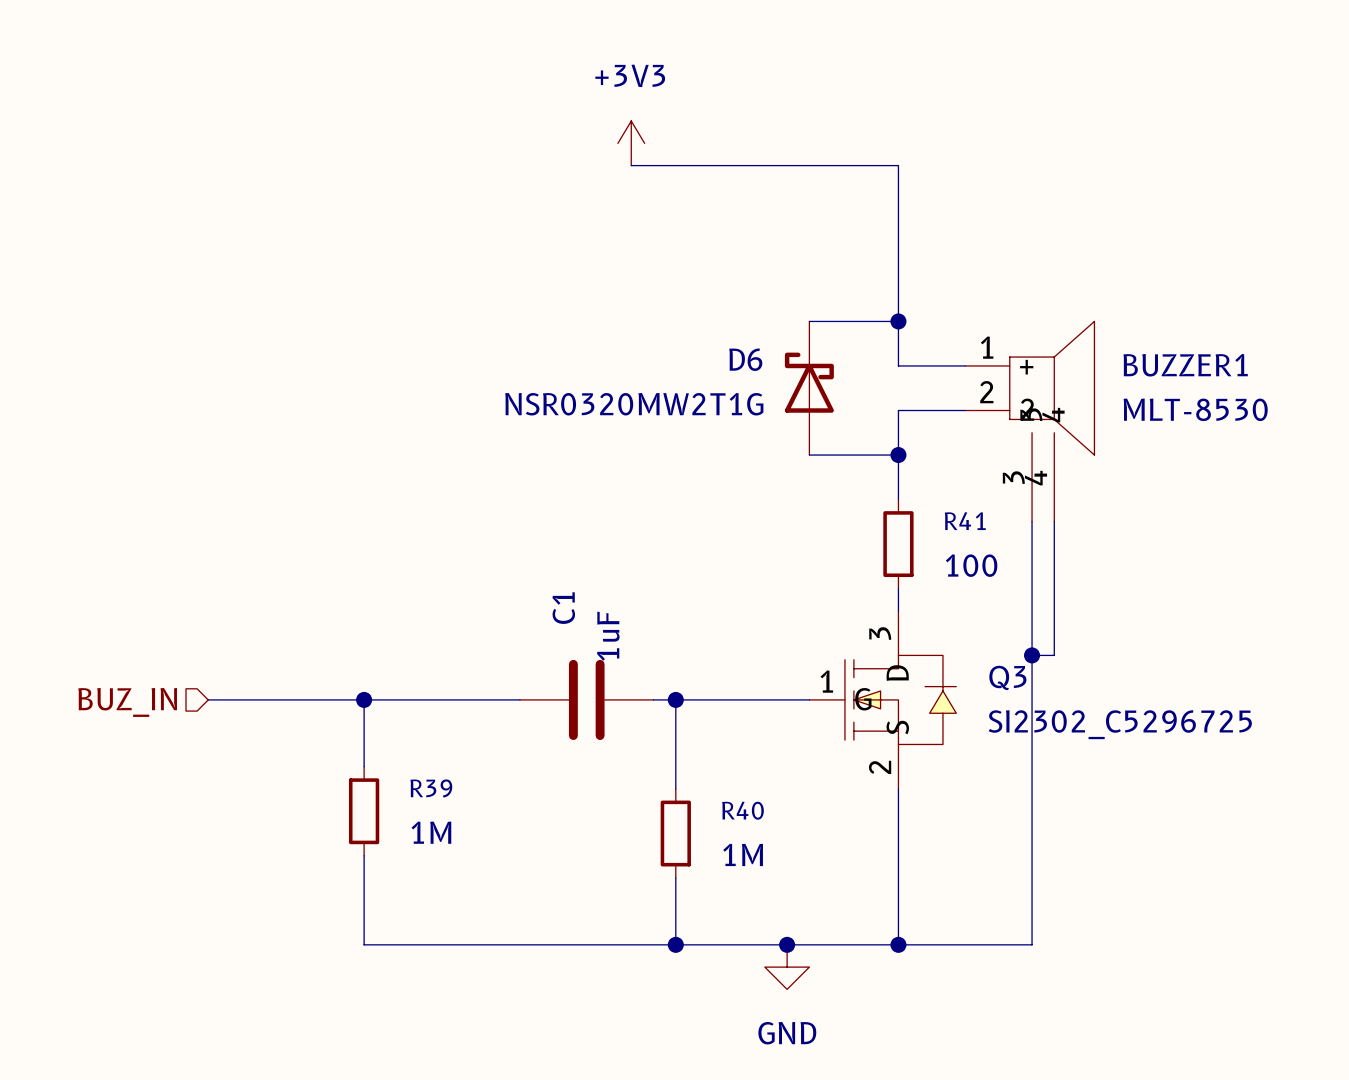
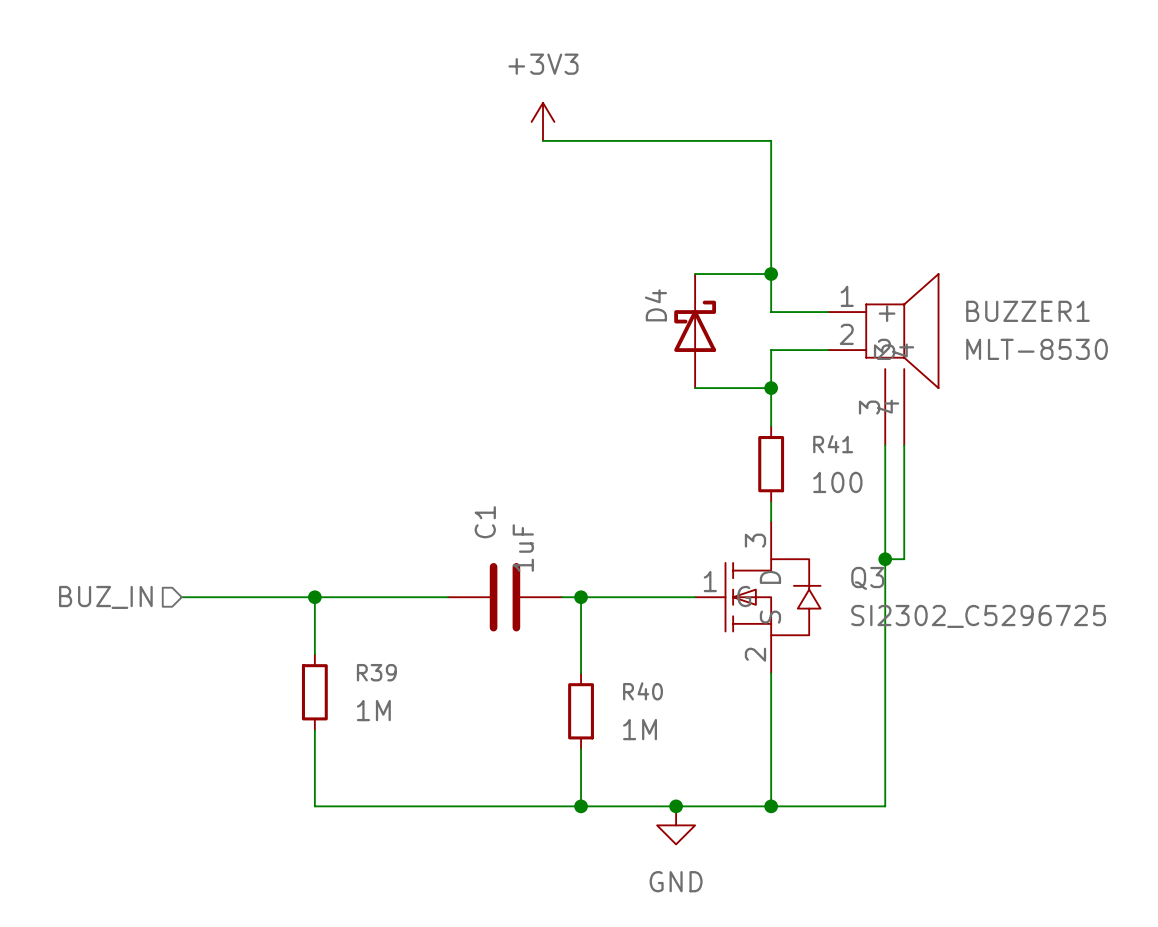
D6: NSR0320MW2T1G (809, 388) -> none
D4: none -> (695, 331)

